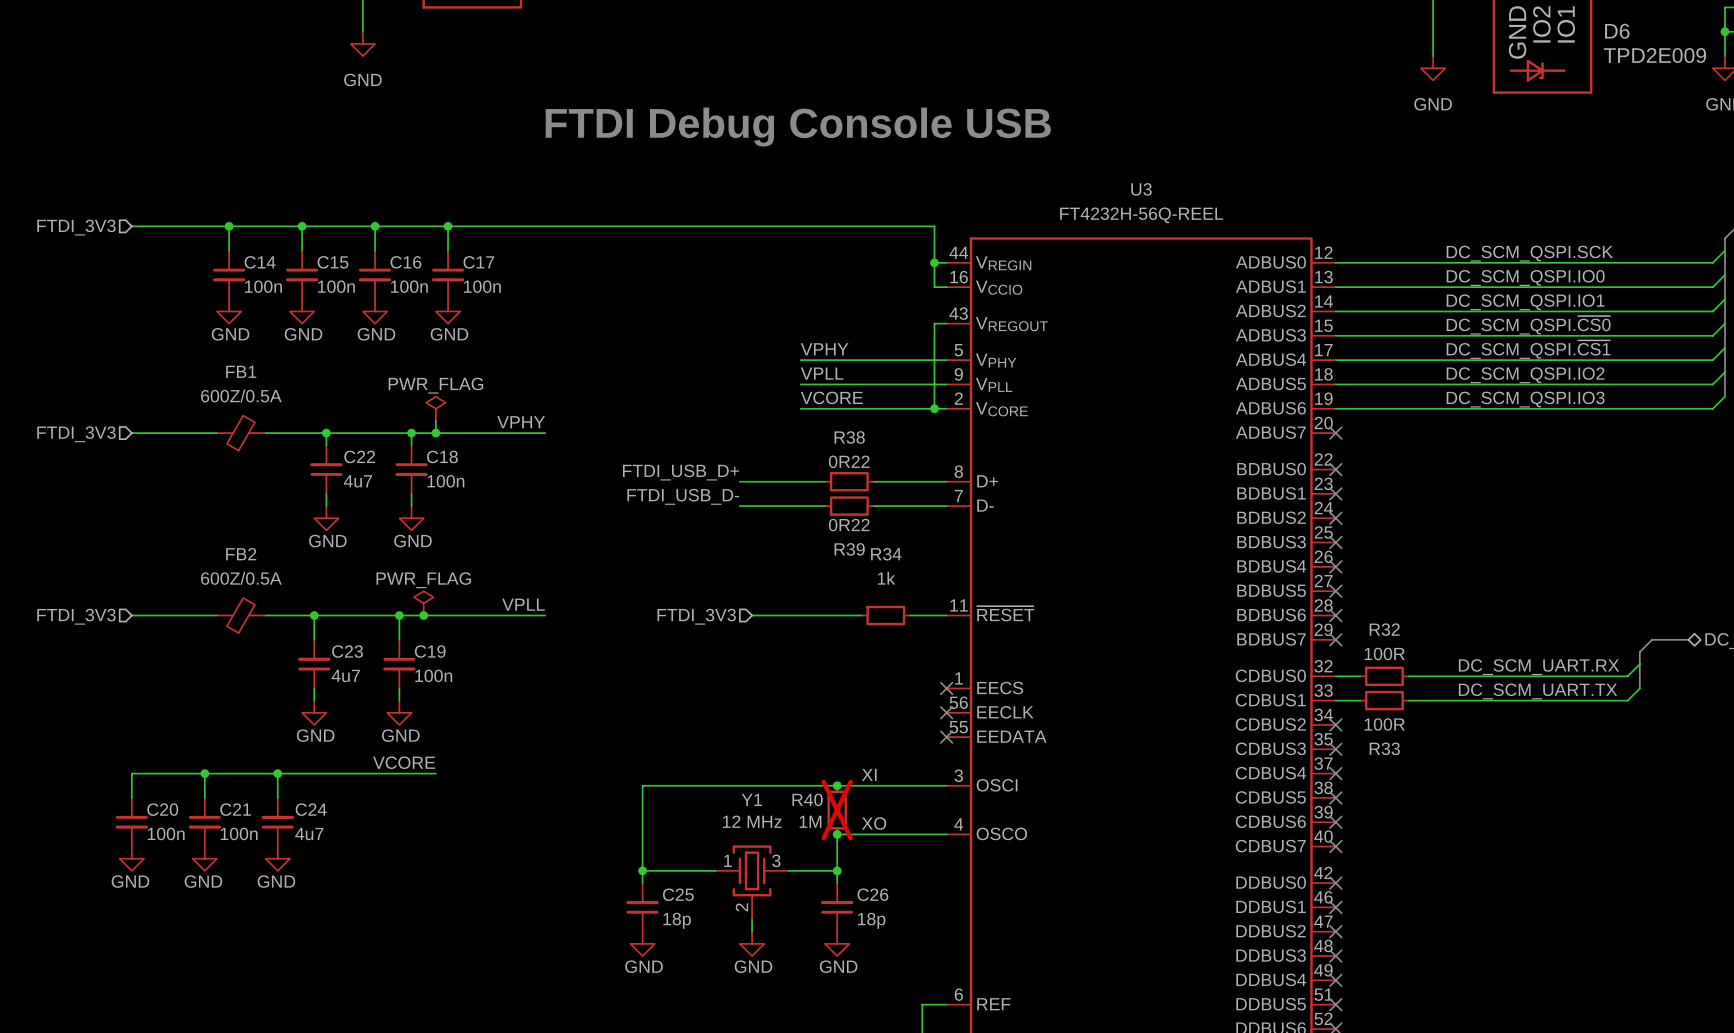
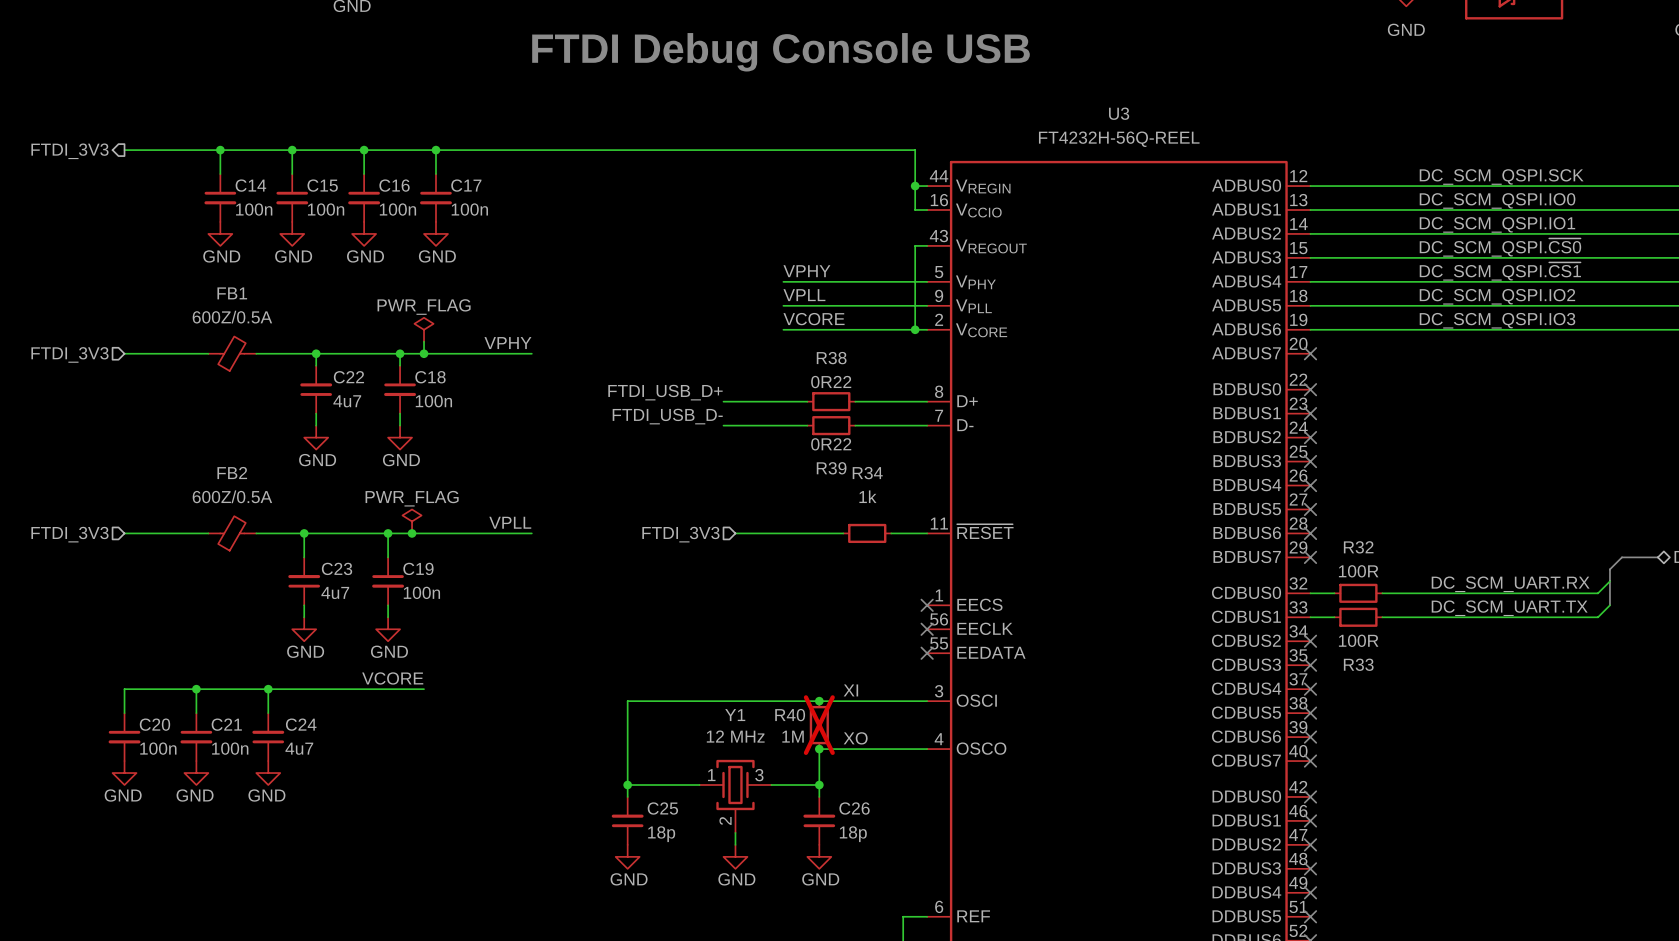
hierarchical label shape: input (76, 227) -> output (69, 151)

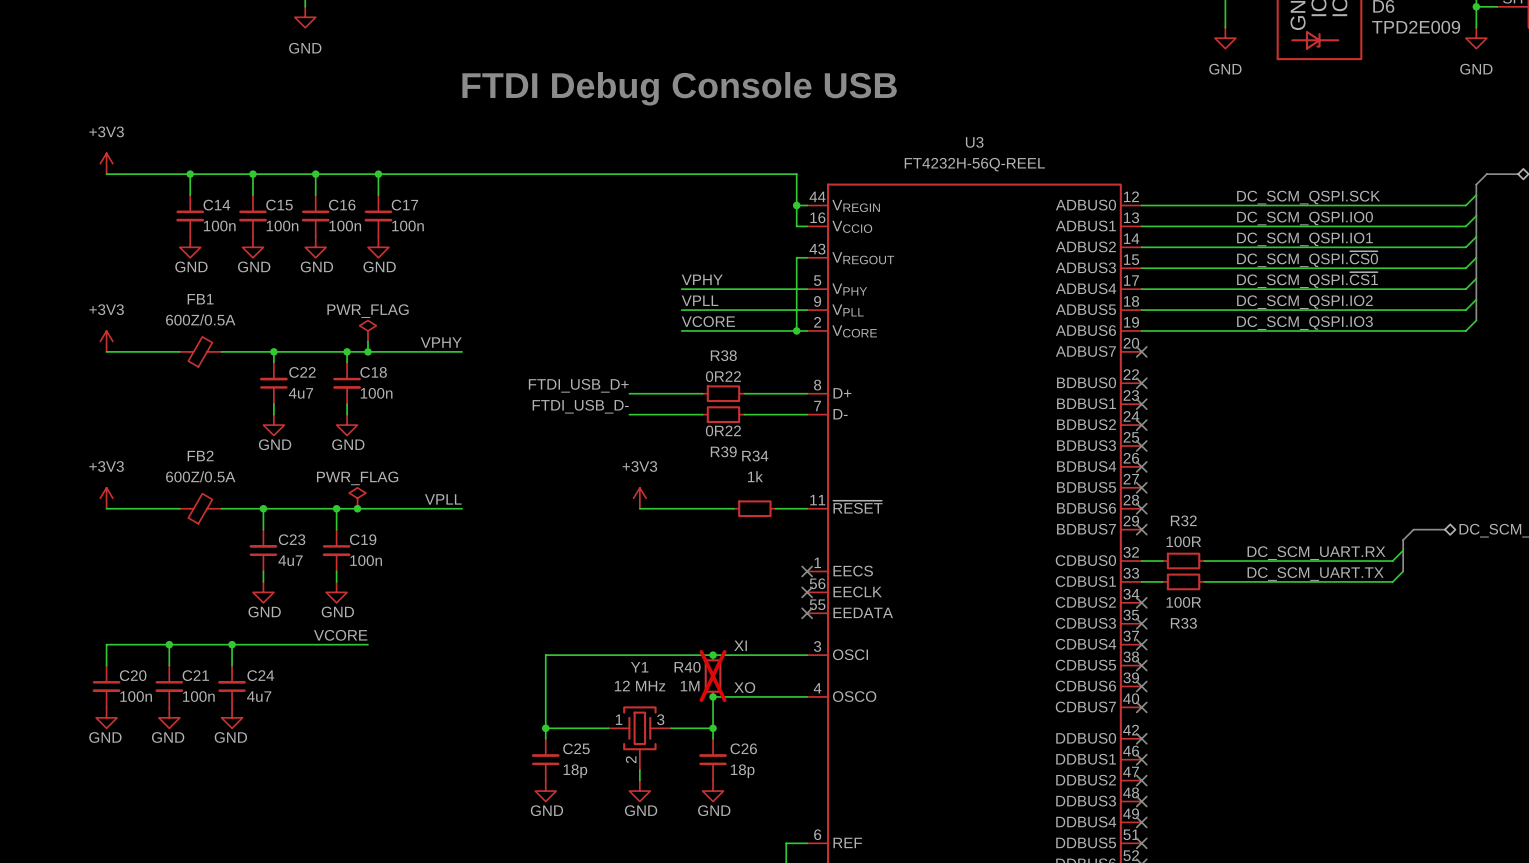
power symbol: none -> +3V3 (106, 163)
hierarchical label: FTDI_3V3 (69, 151) -> none
power symbol: none -> +3V3 (106, 341)
hierarchical label: FTDI_3V3 (69, 354) -> none
power symbol: none -> +3V3 (106, 498)
power symbol: none -> +3V3 (639, 498)
hierarchical label: FTDI_3V3 (69, 534) -> none
hierarchical label: FTDI_3V3 (680, 534) -> none

